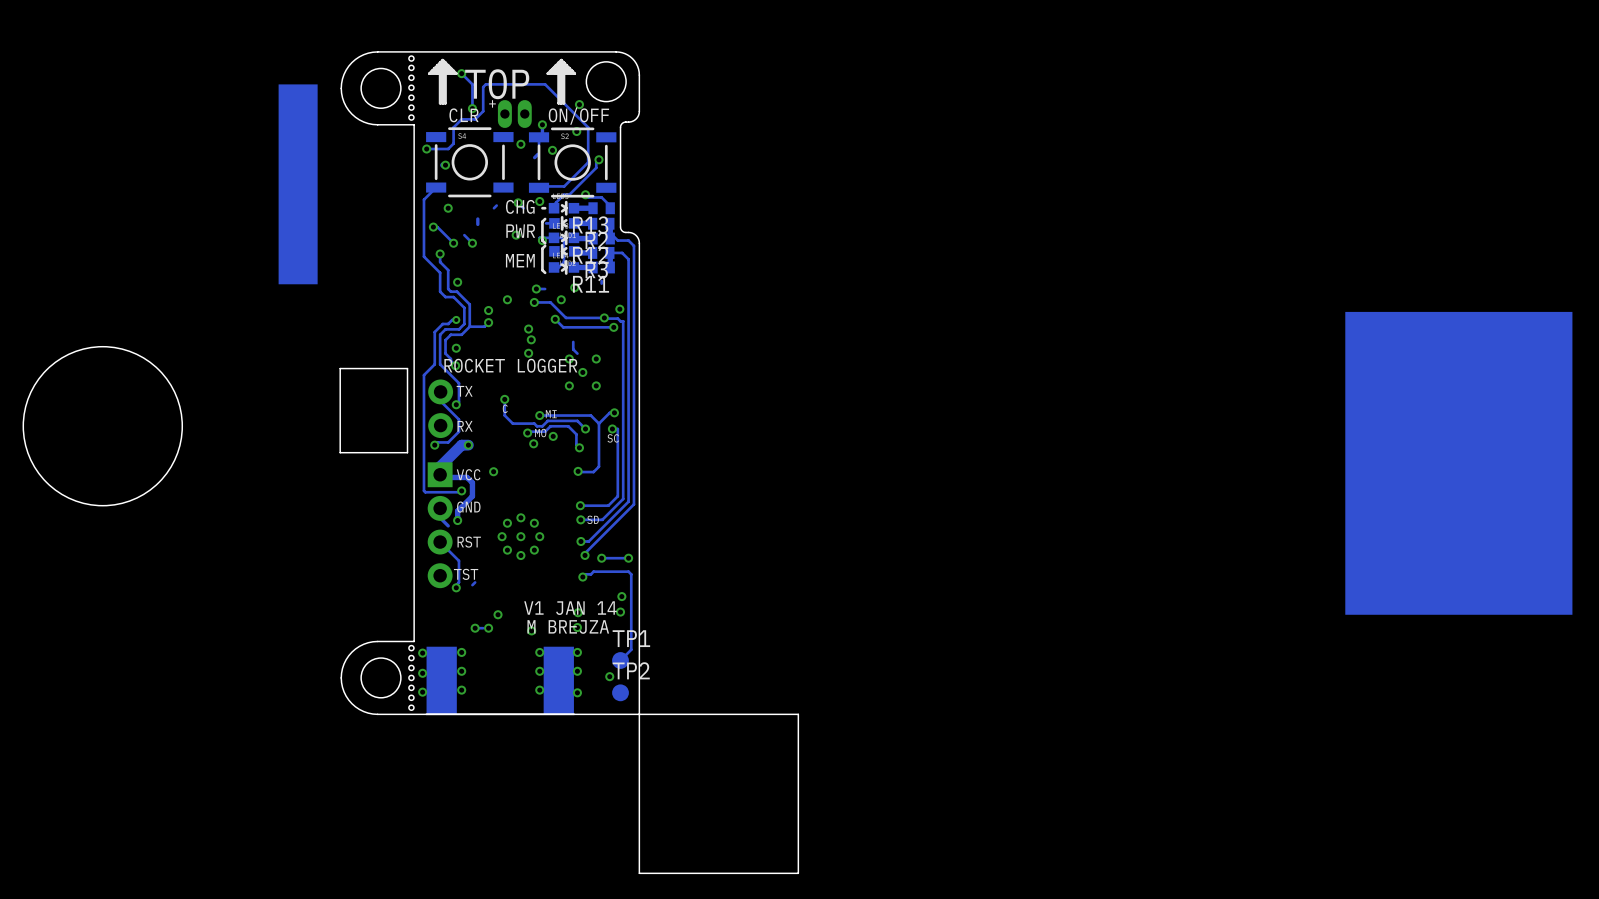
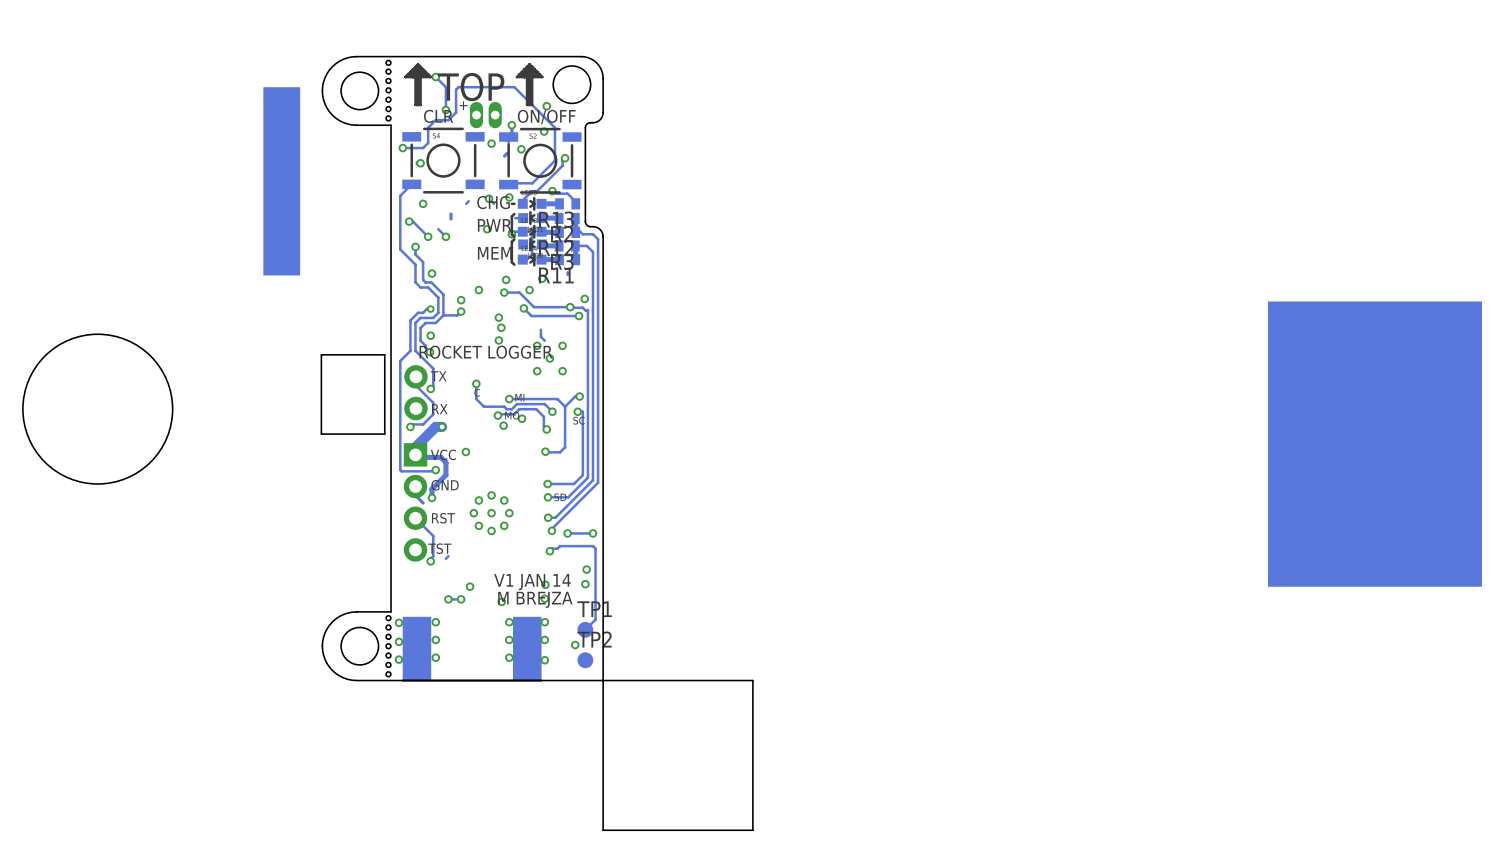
track: (545, 288) (536, 288) -> none

